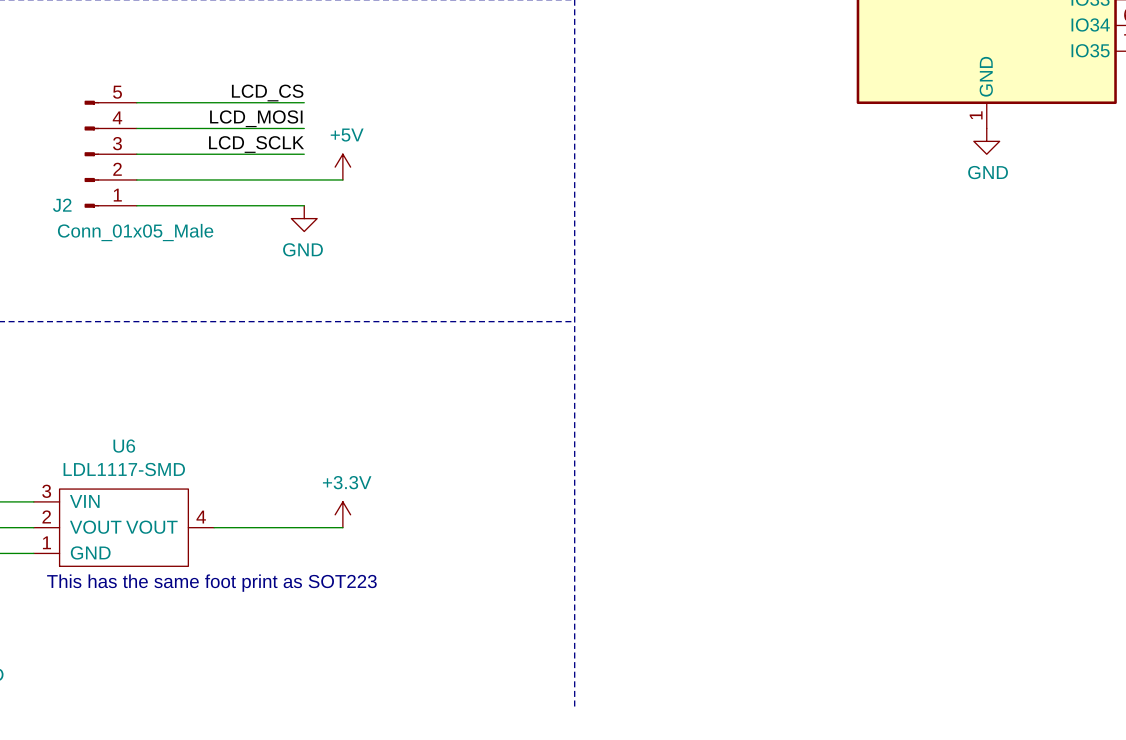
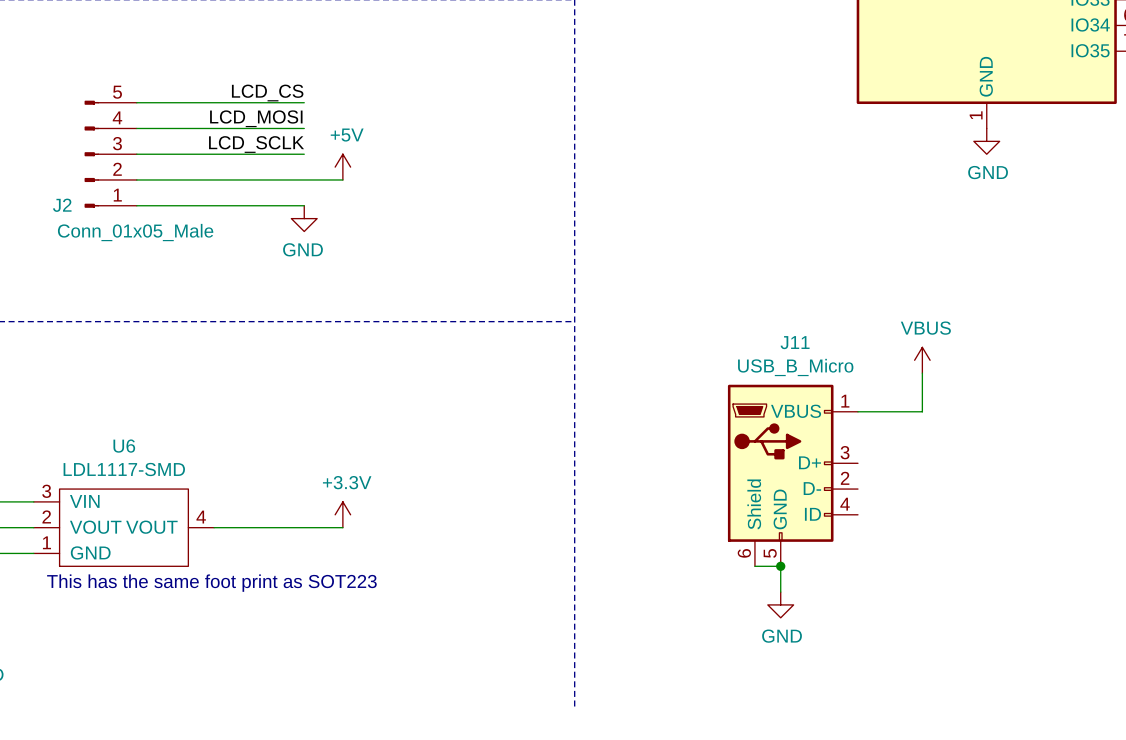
power symbol: none -> VBUS (922, 360)
wire: none -> (922, 373) (922, 411) (857, 411)
J11: none -> USB_B_Micro (792, 475)
wire: none -> (754, 566) (780, 566) (780, 592)
junction: none -> (780, 566)
power symbol: none -> GND (780, 604)

